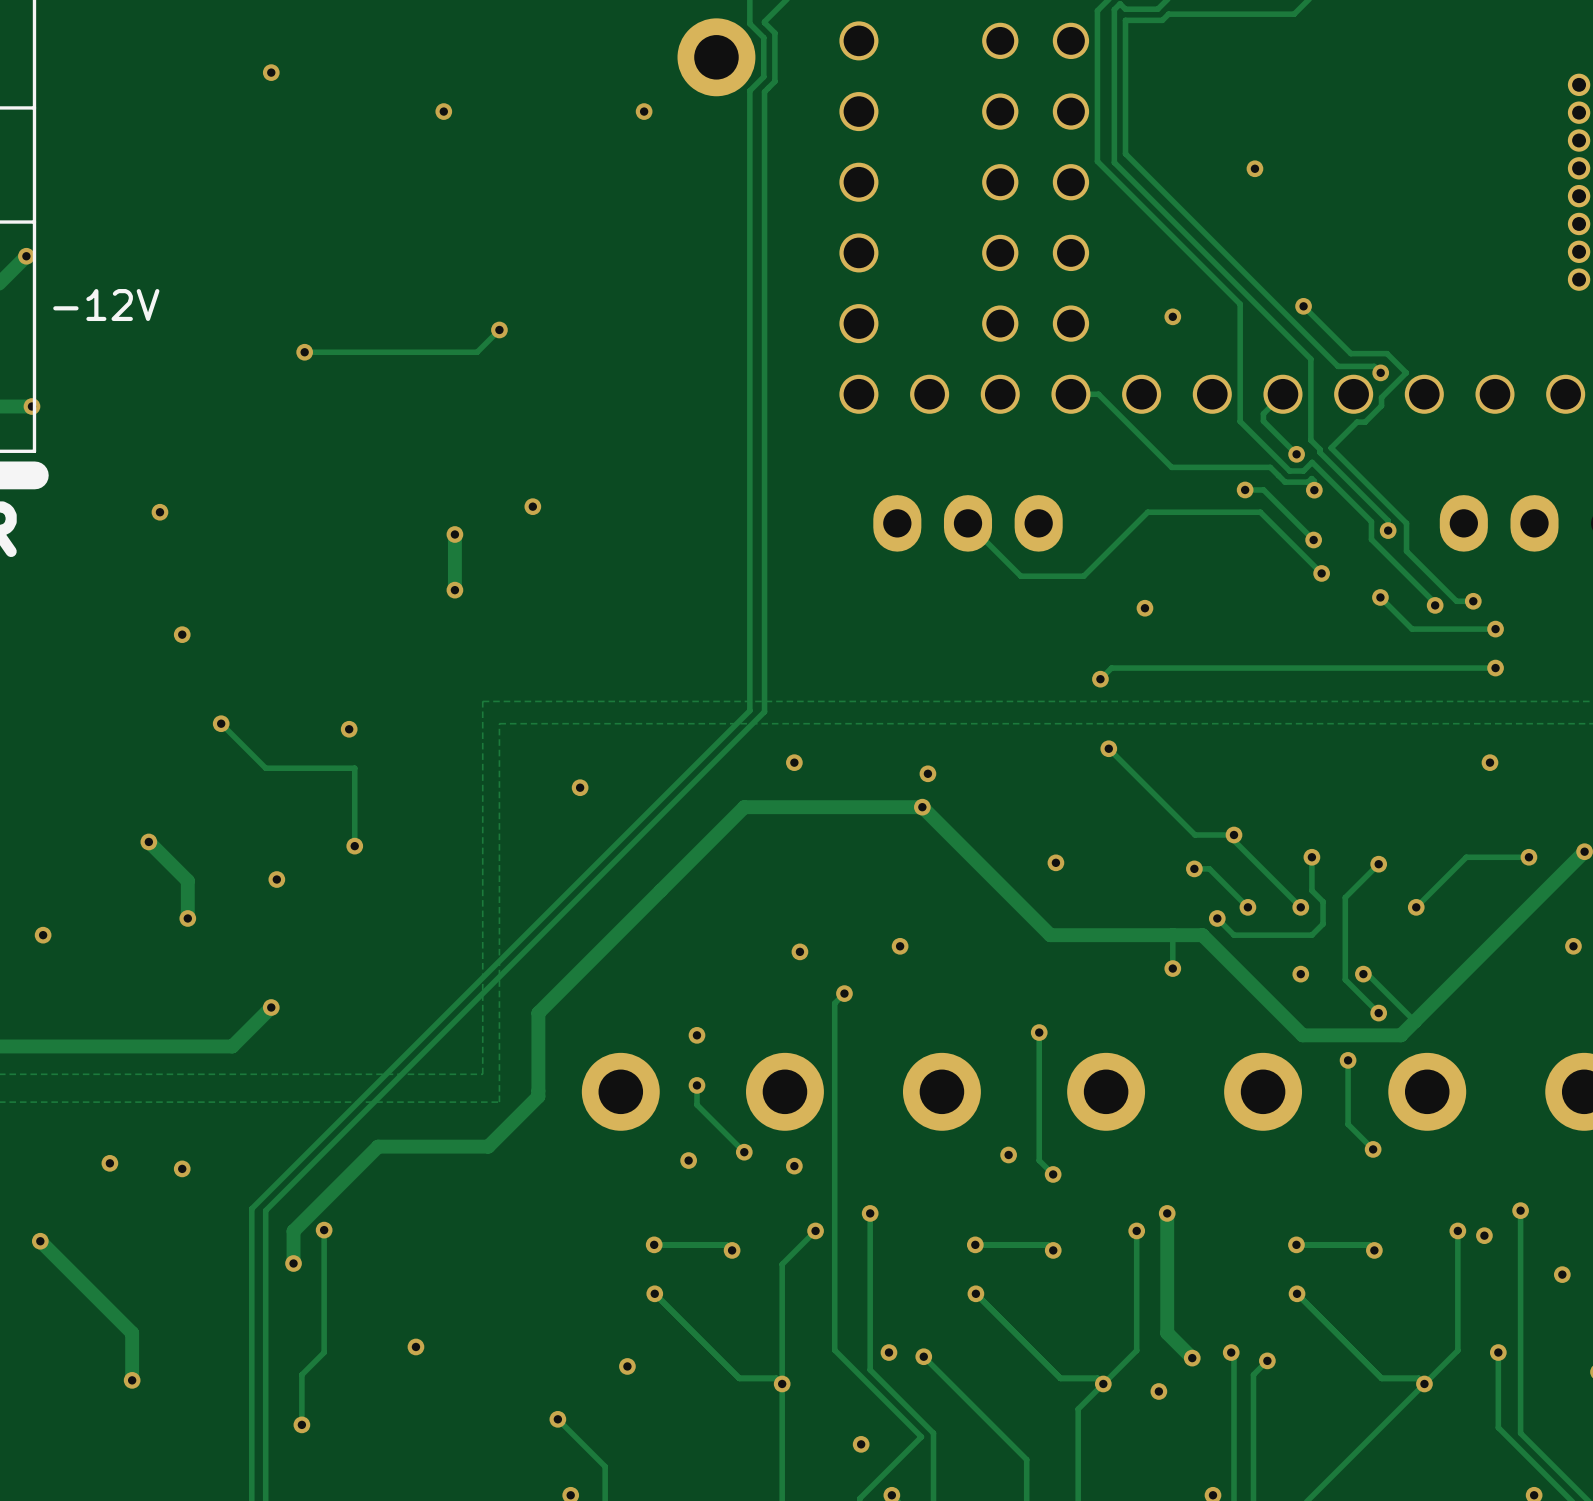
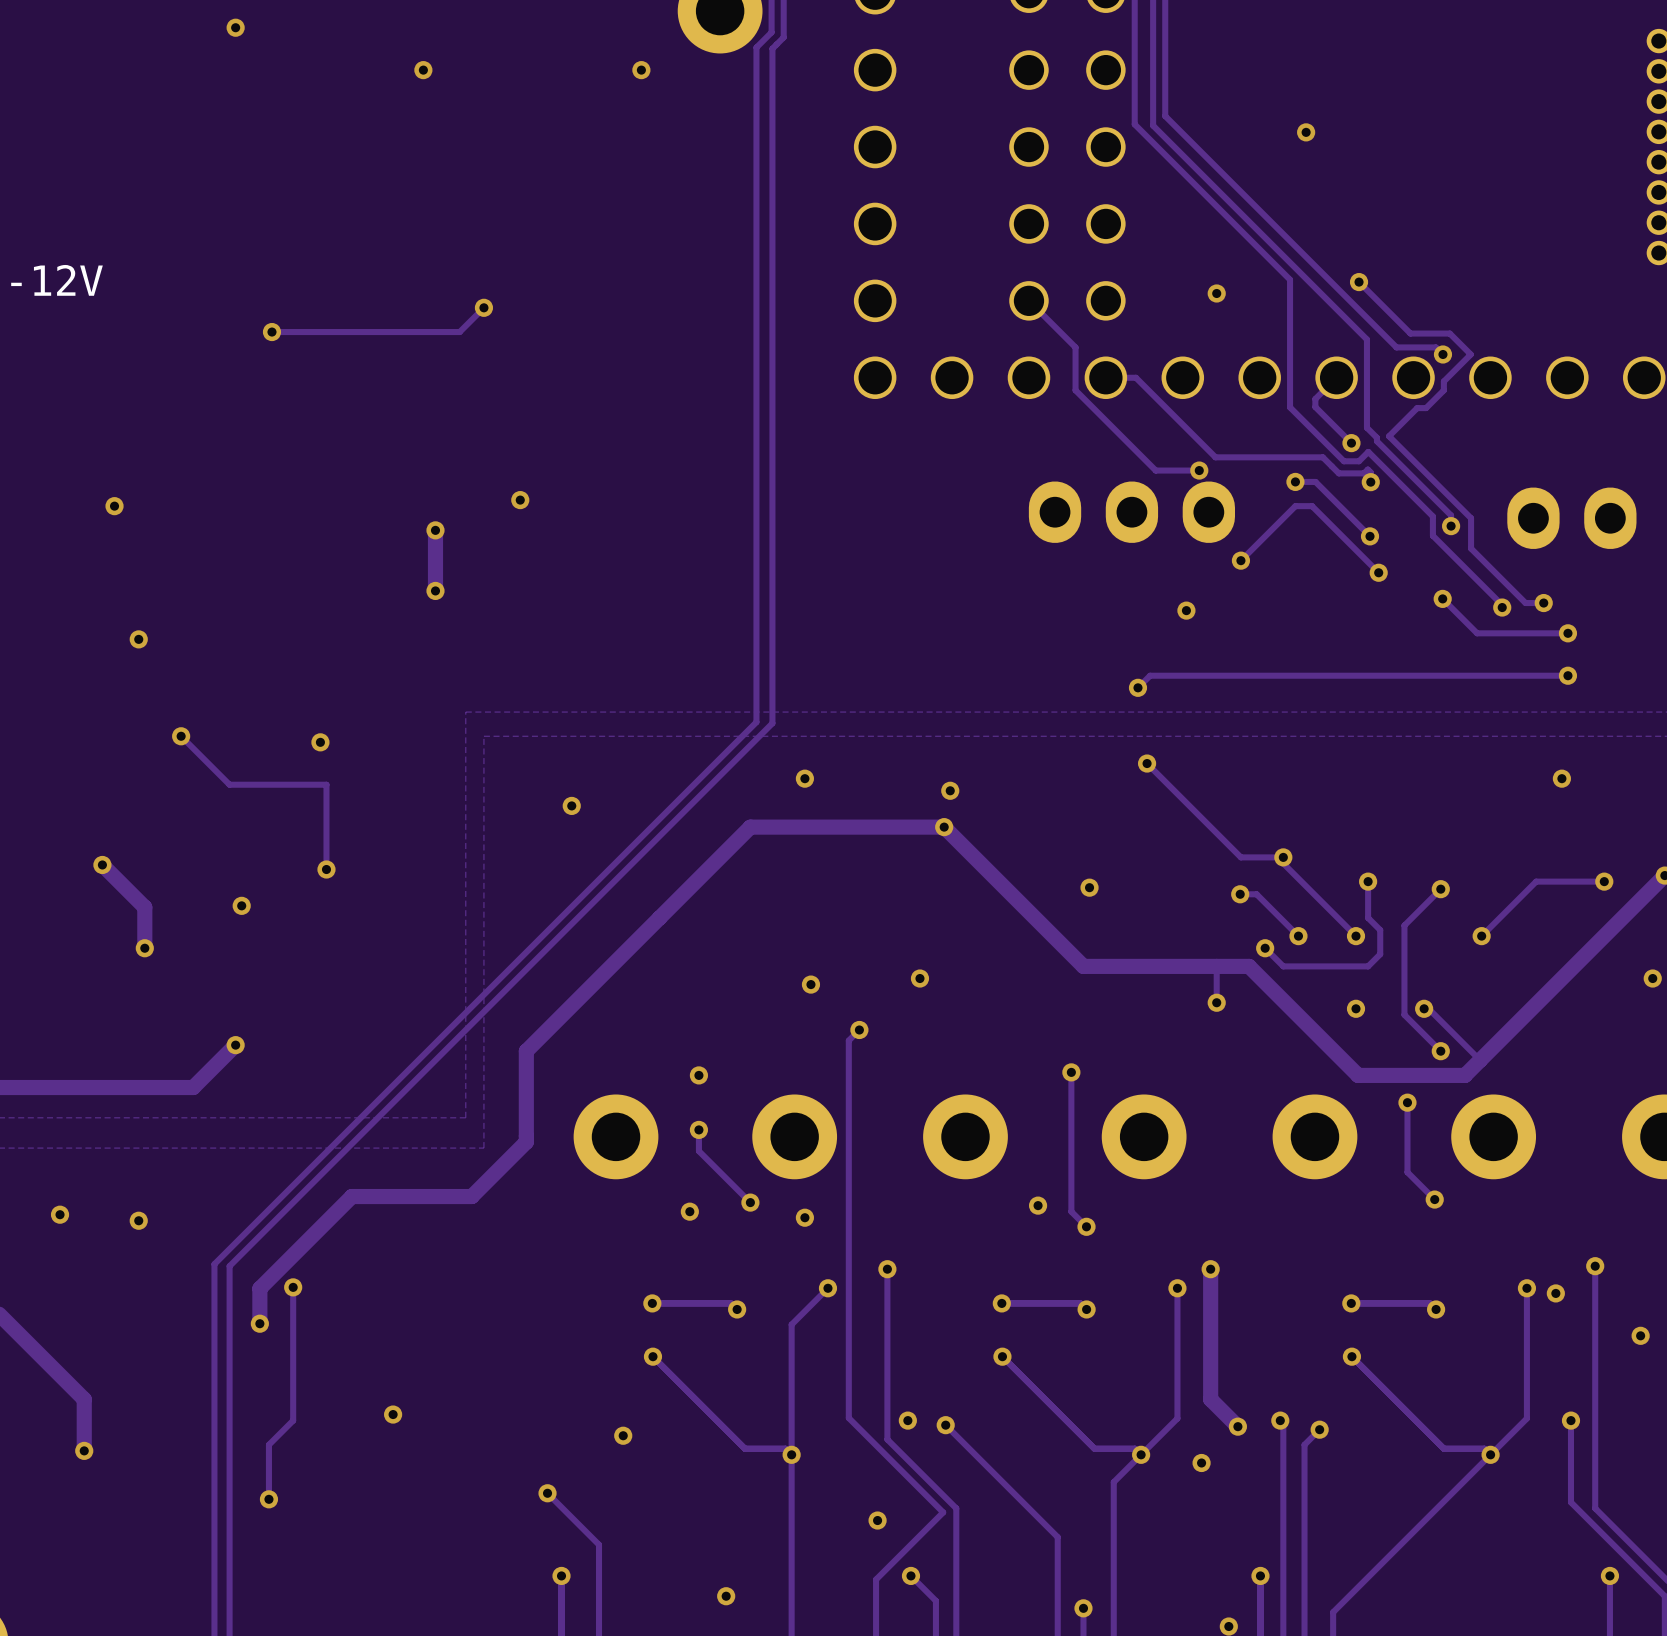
track: none -> (1028, 300) (1075, 347) (1075, 390) (1155, 470) (1199, 470)
via: none -> (1199, 470)
track: (1245, 512) (1147, 512) (1083, 576) (1020, 576) (968, 523) -> (1295, 506) (1240, 560)
part position: (968, 523) -> (1131, 512)
via: none -> (1240, 560)

